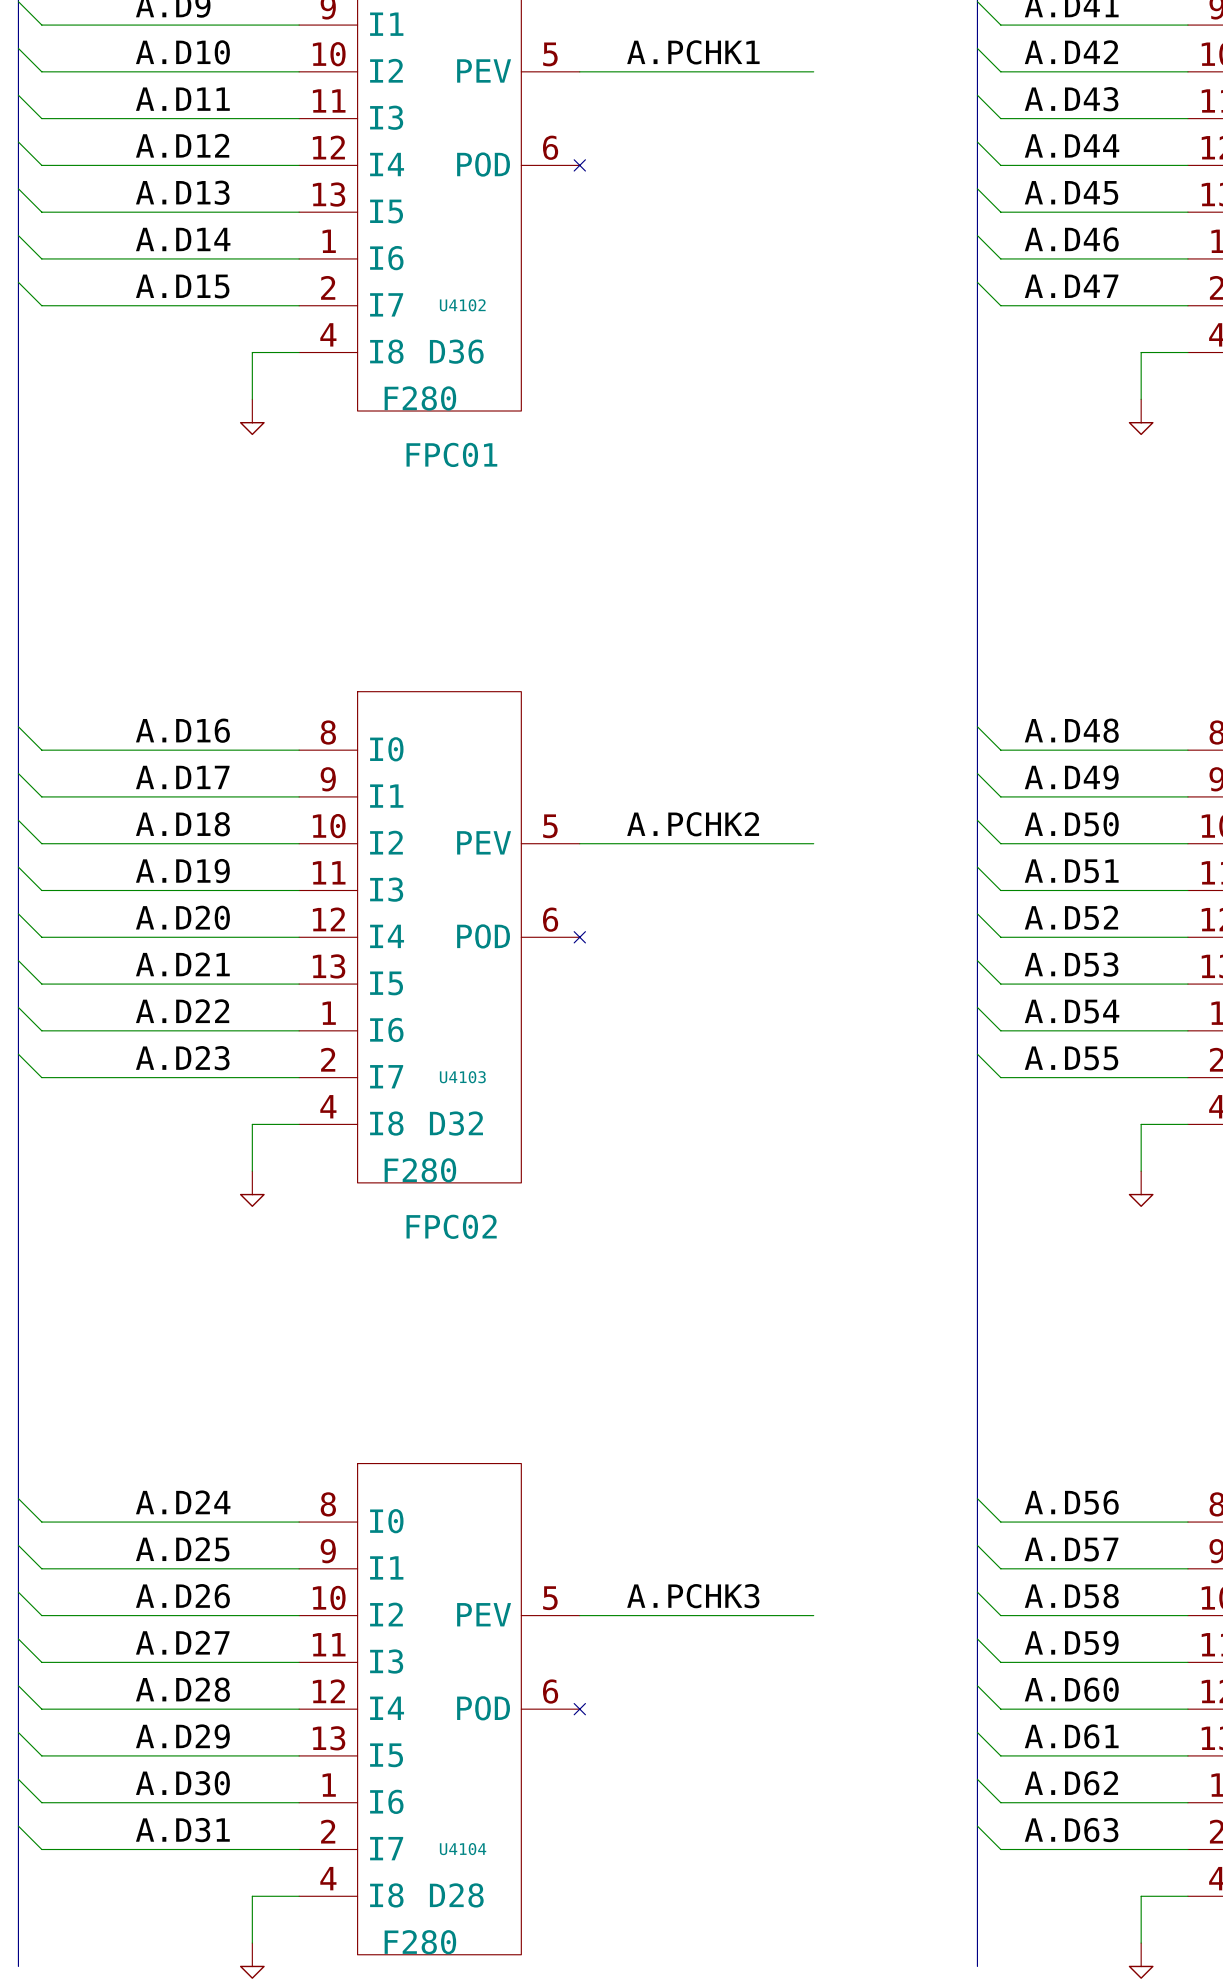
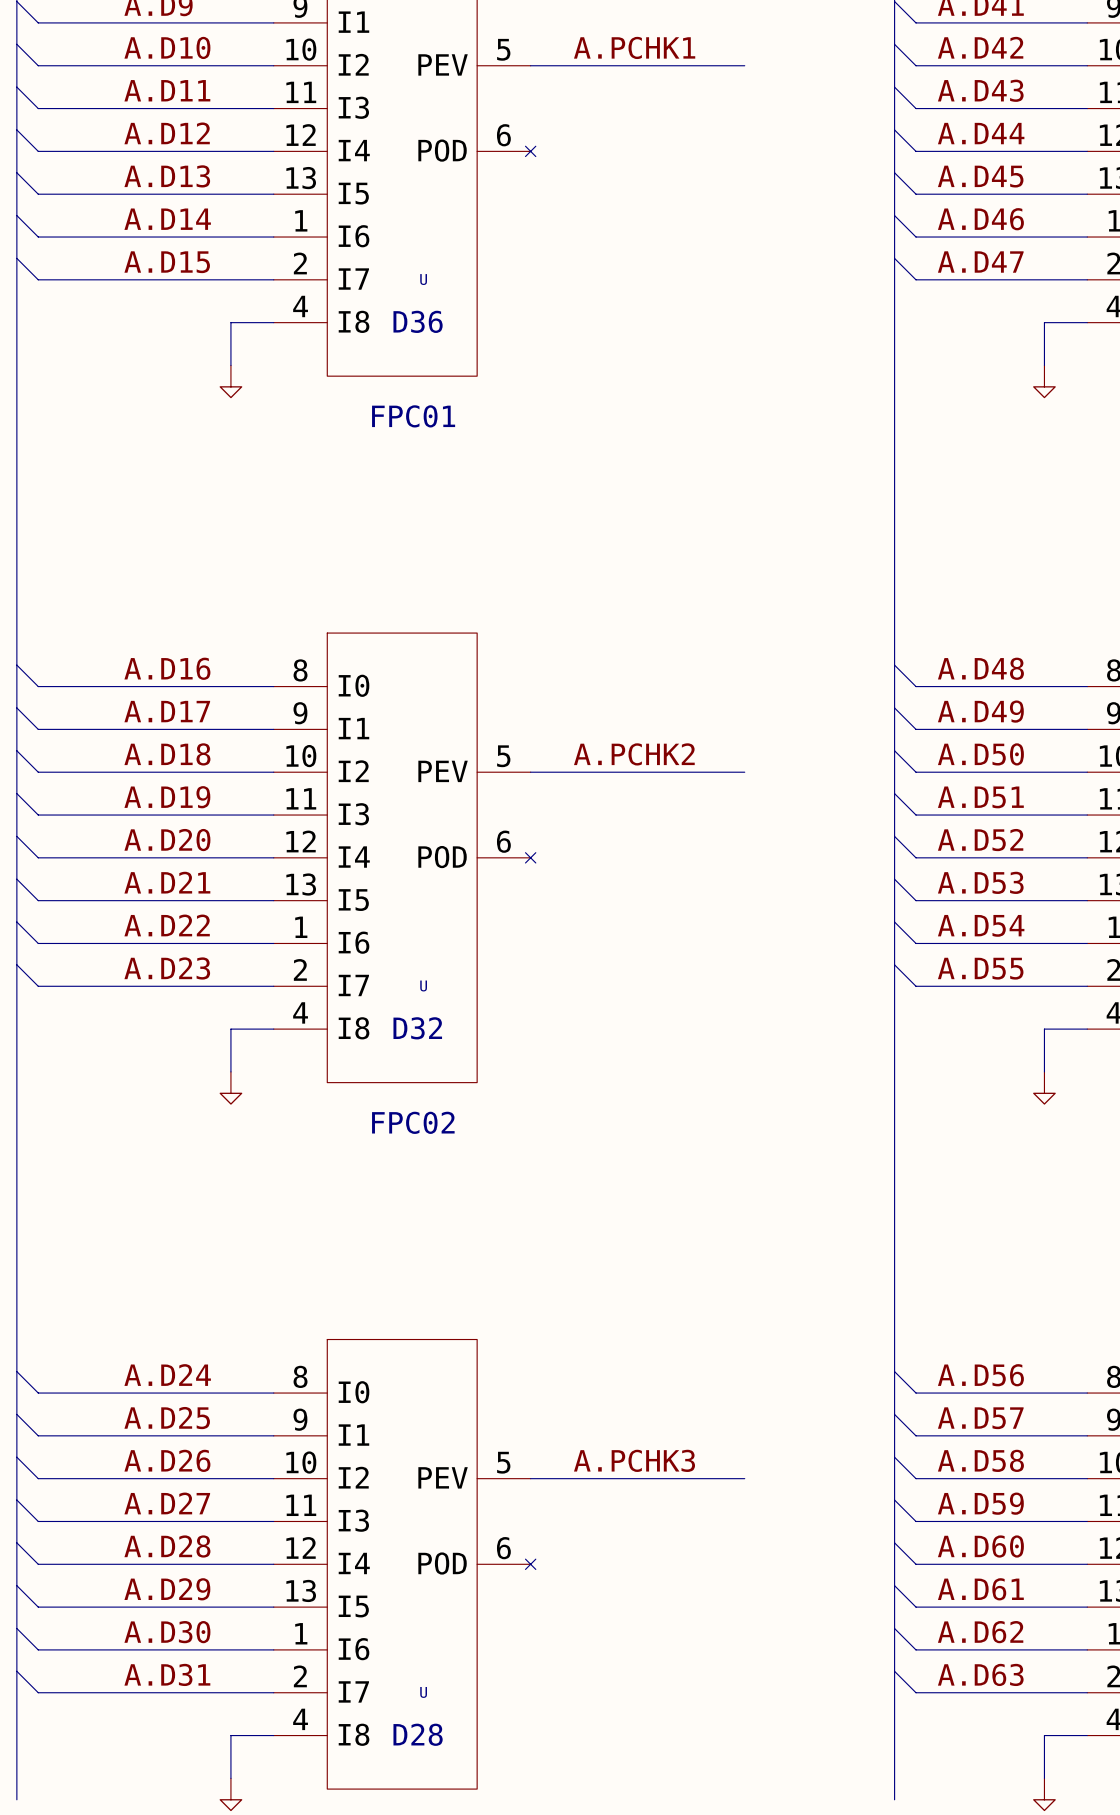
U4102 name: U4102 (462, 305) -> U (423, 279)
U4102 value: F280 (420, 398) -> none
U4103 name: U4103 (462, 1077) -> U (423, 985)
U4103 value: F280 (420, 1170) -> none
U4104 name: U4104 (463, 1849) -> U (423, 1692)
U4104 value: F280 (420, 1942) -> none

